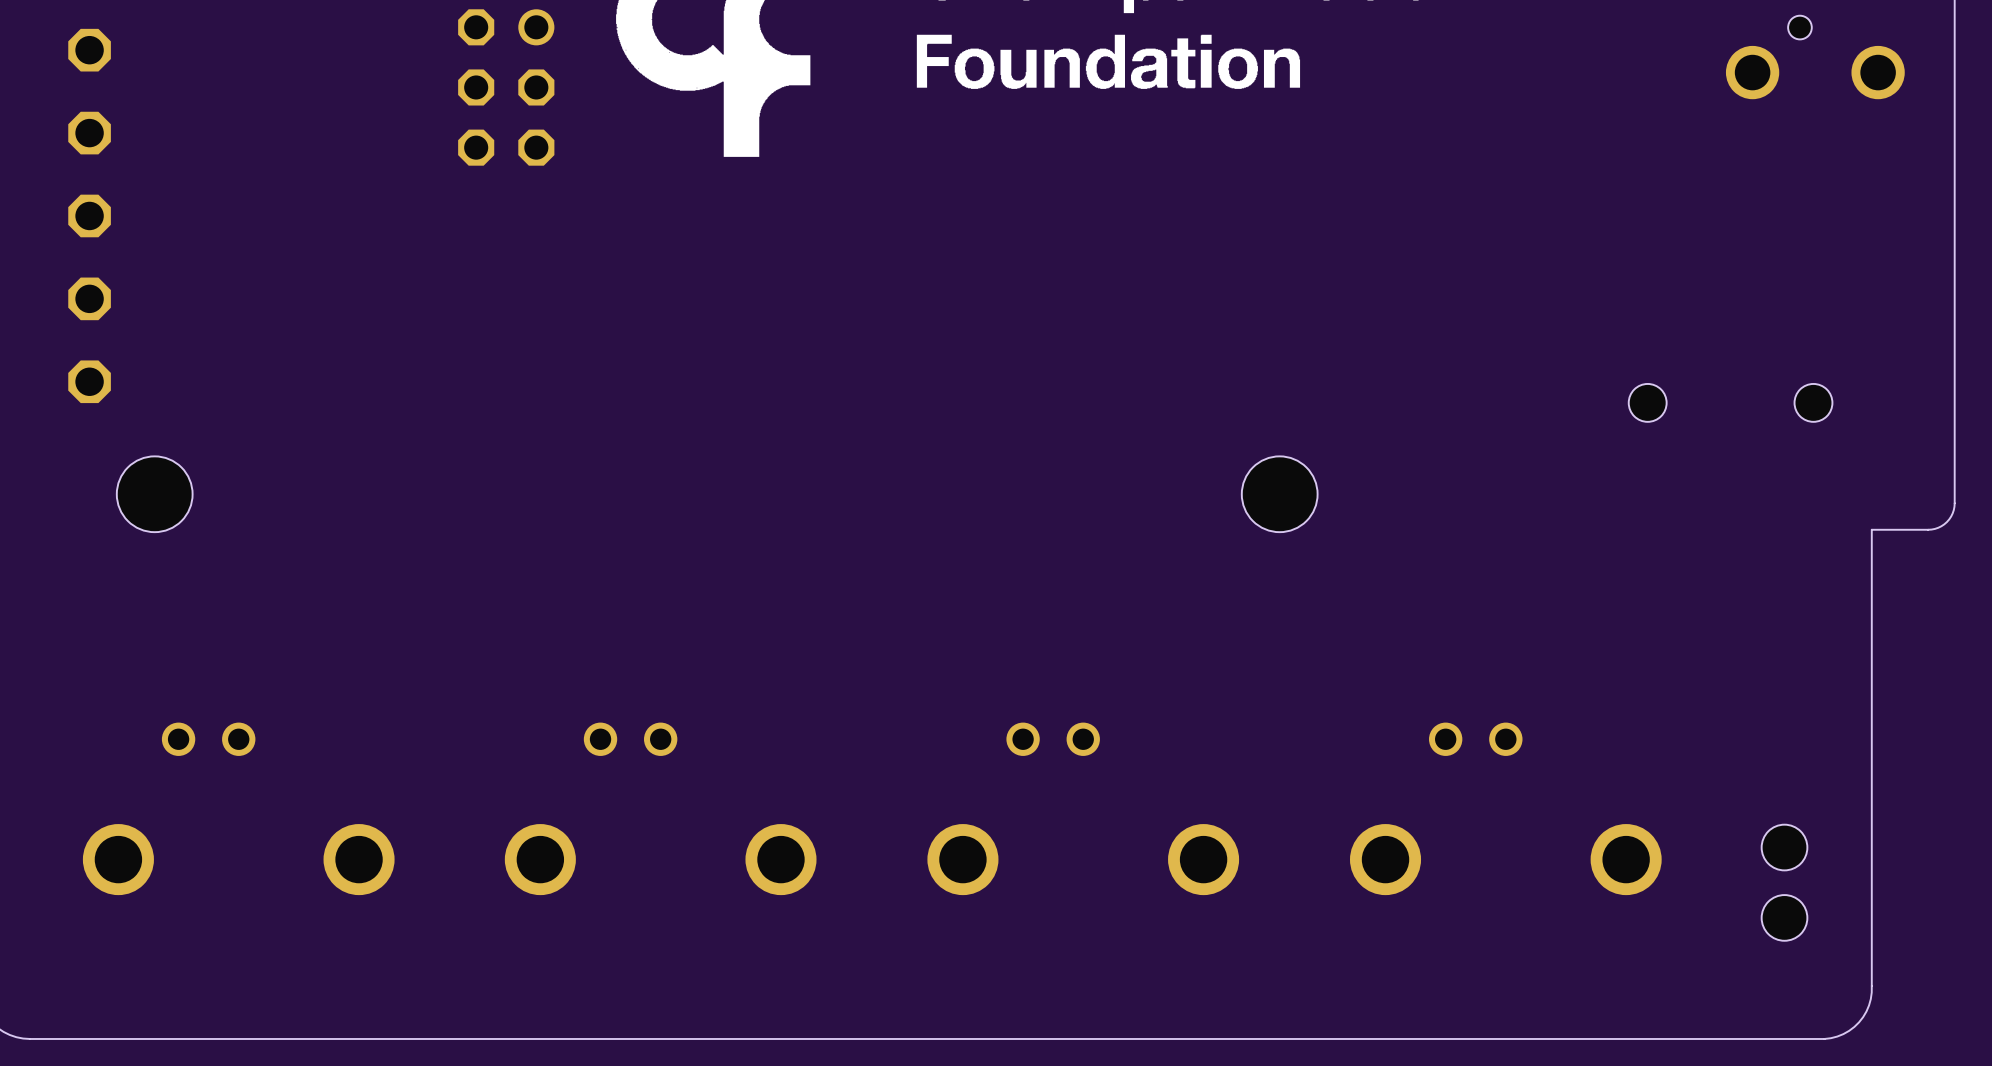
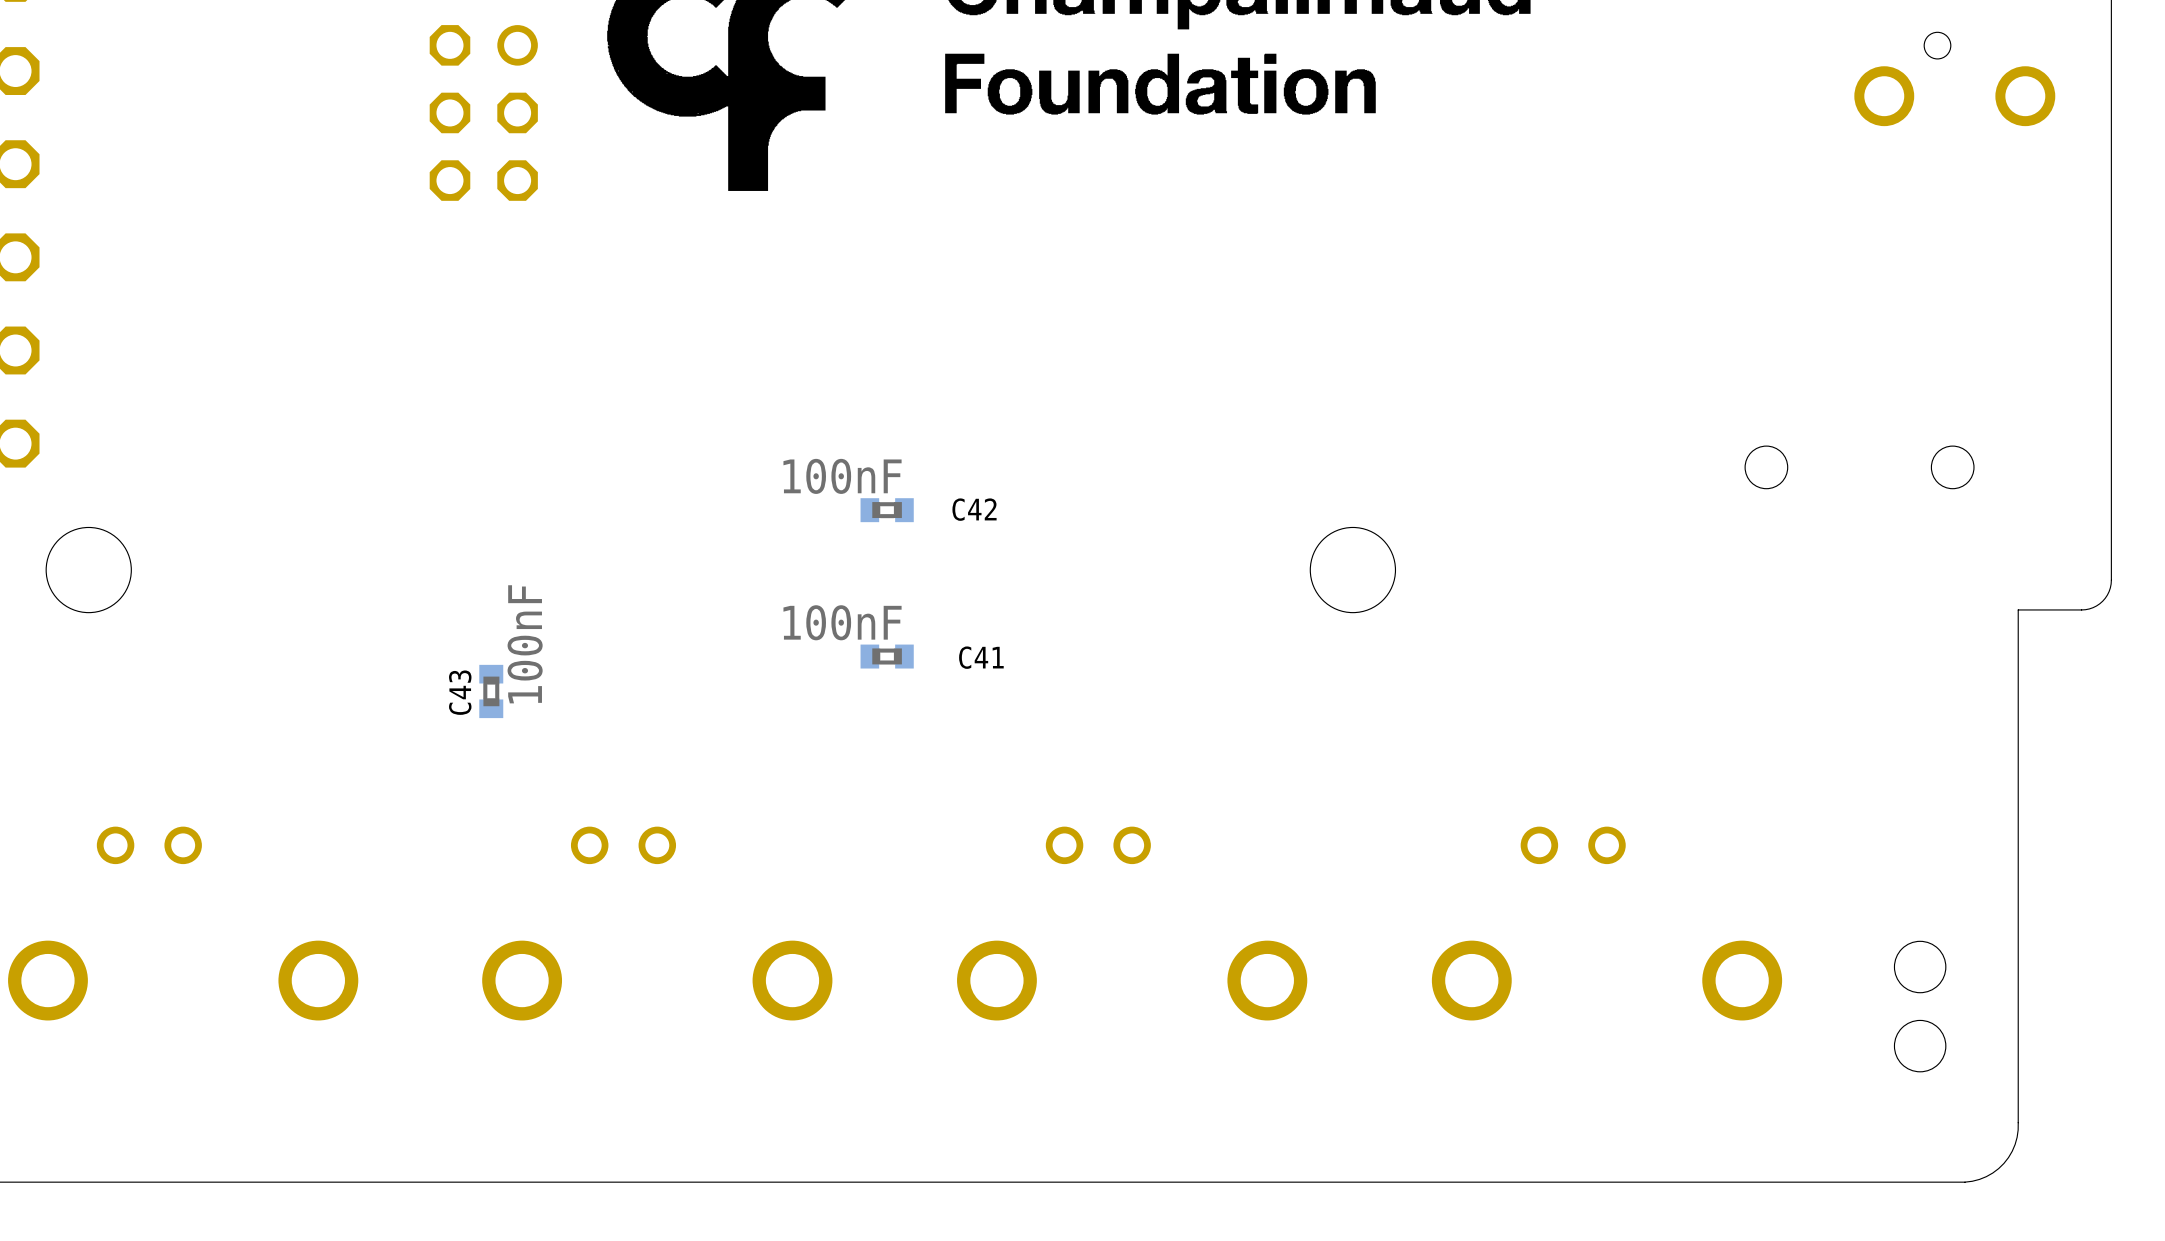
C42: none -> 100nF (887, 510)
C41: none -> 100nF (887, 656)
C43: none -> 100nF (491, 691)

